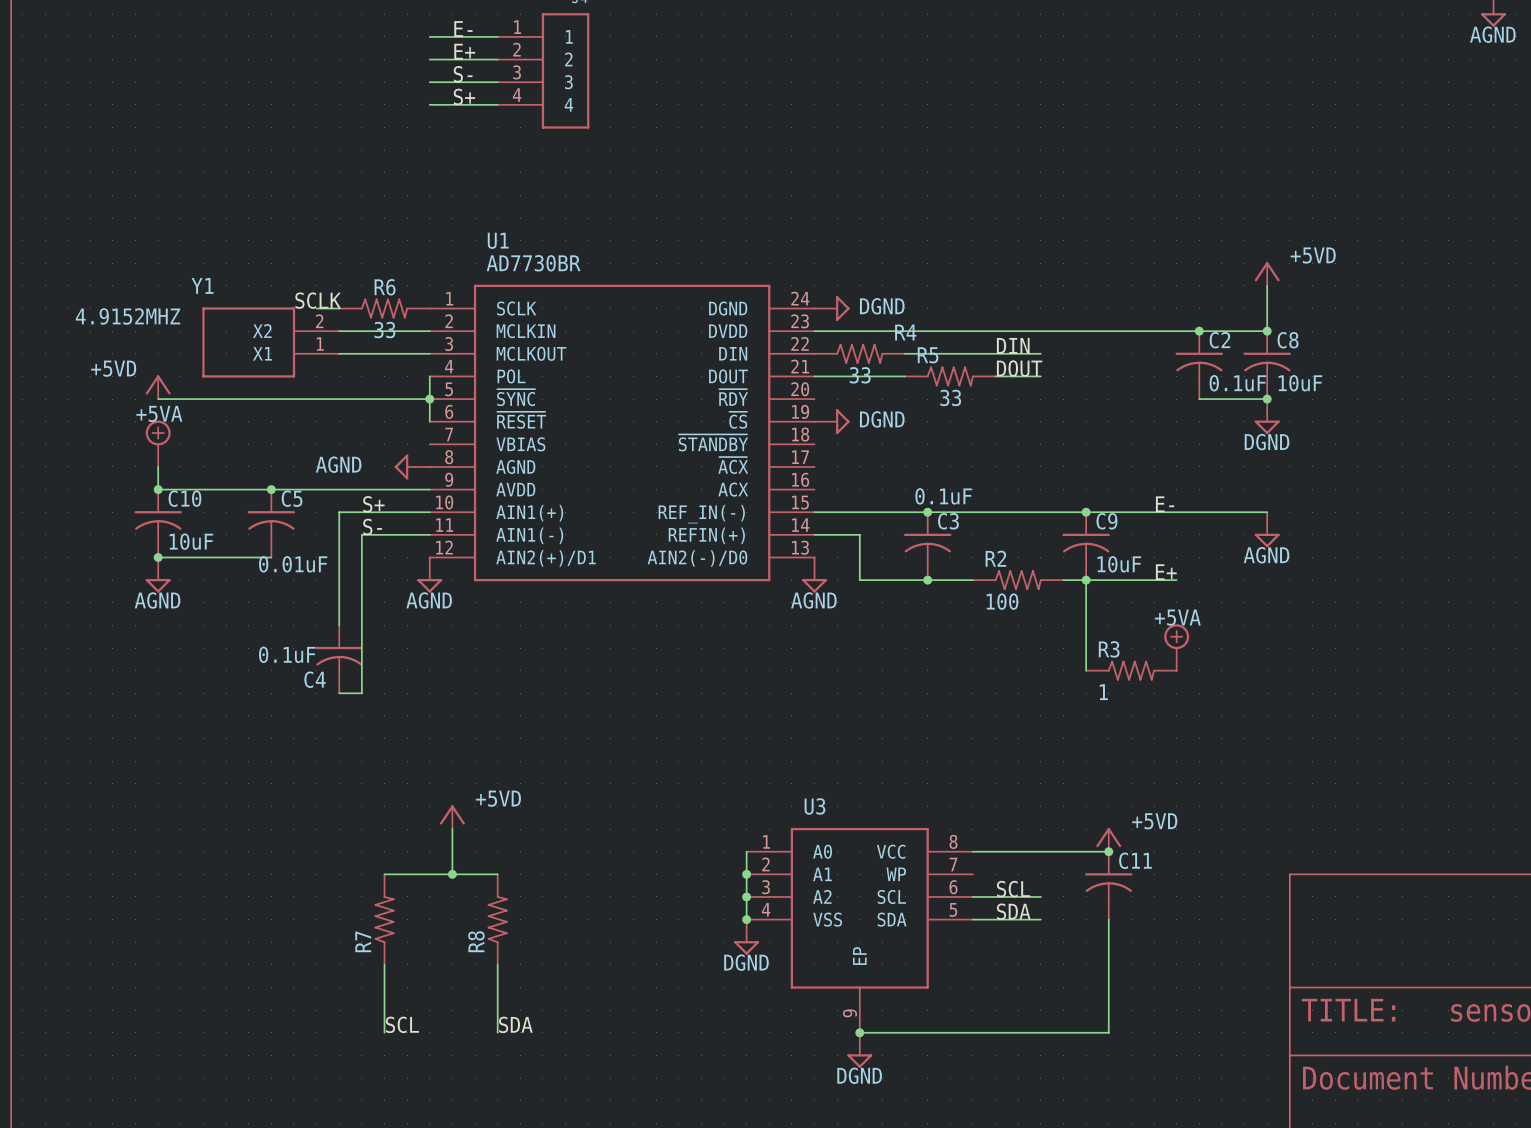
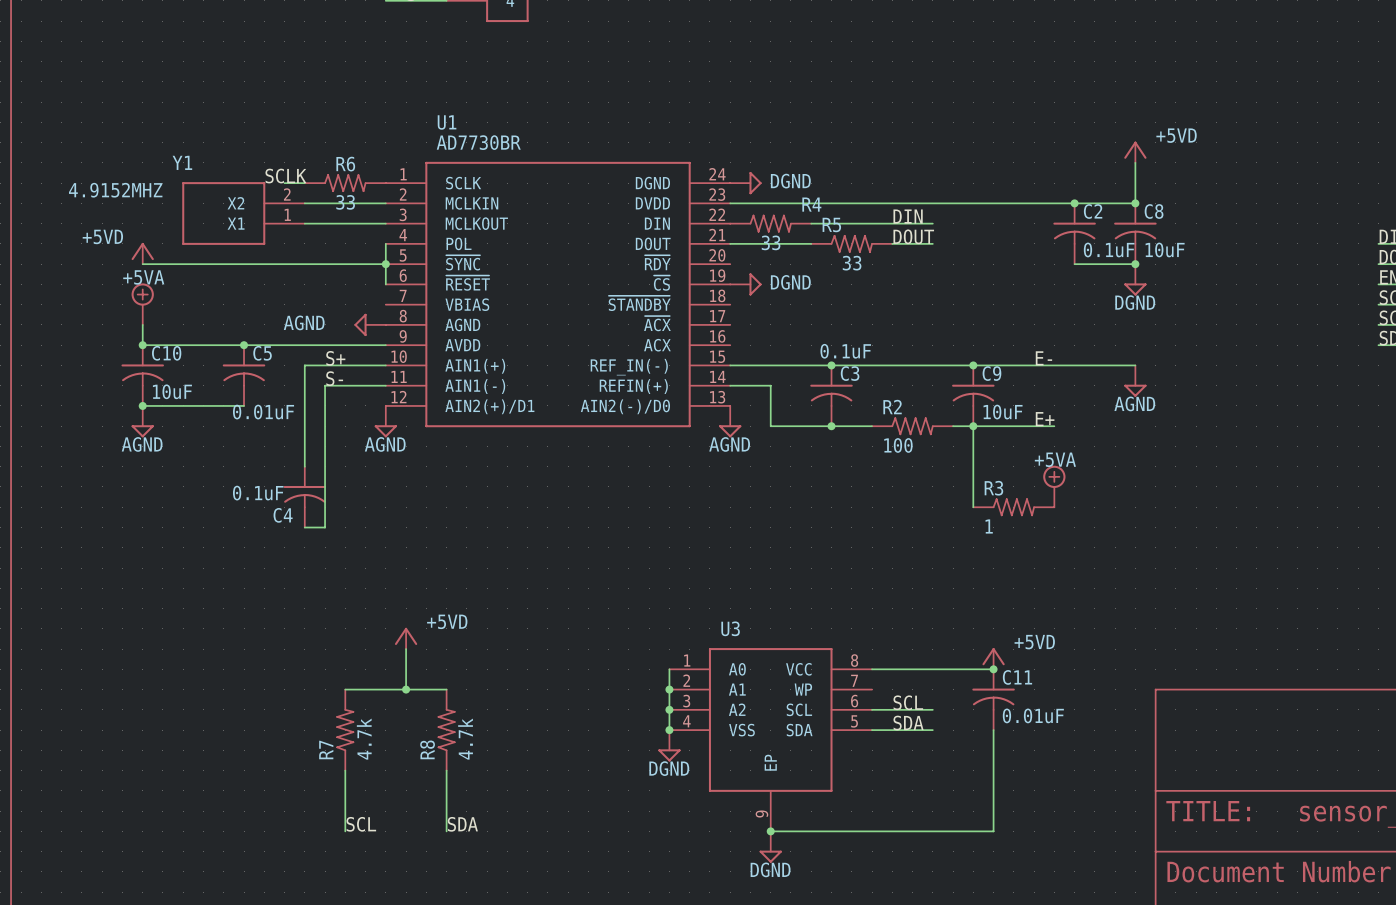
C11 value: none -> 0.01uF (1033, 715)
R7 value: none -> 4.7k (364, 739)
R8 value: none -> 4.7k (465, 739)

